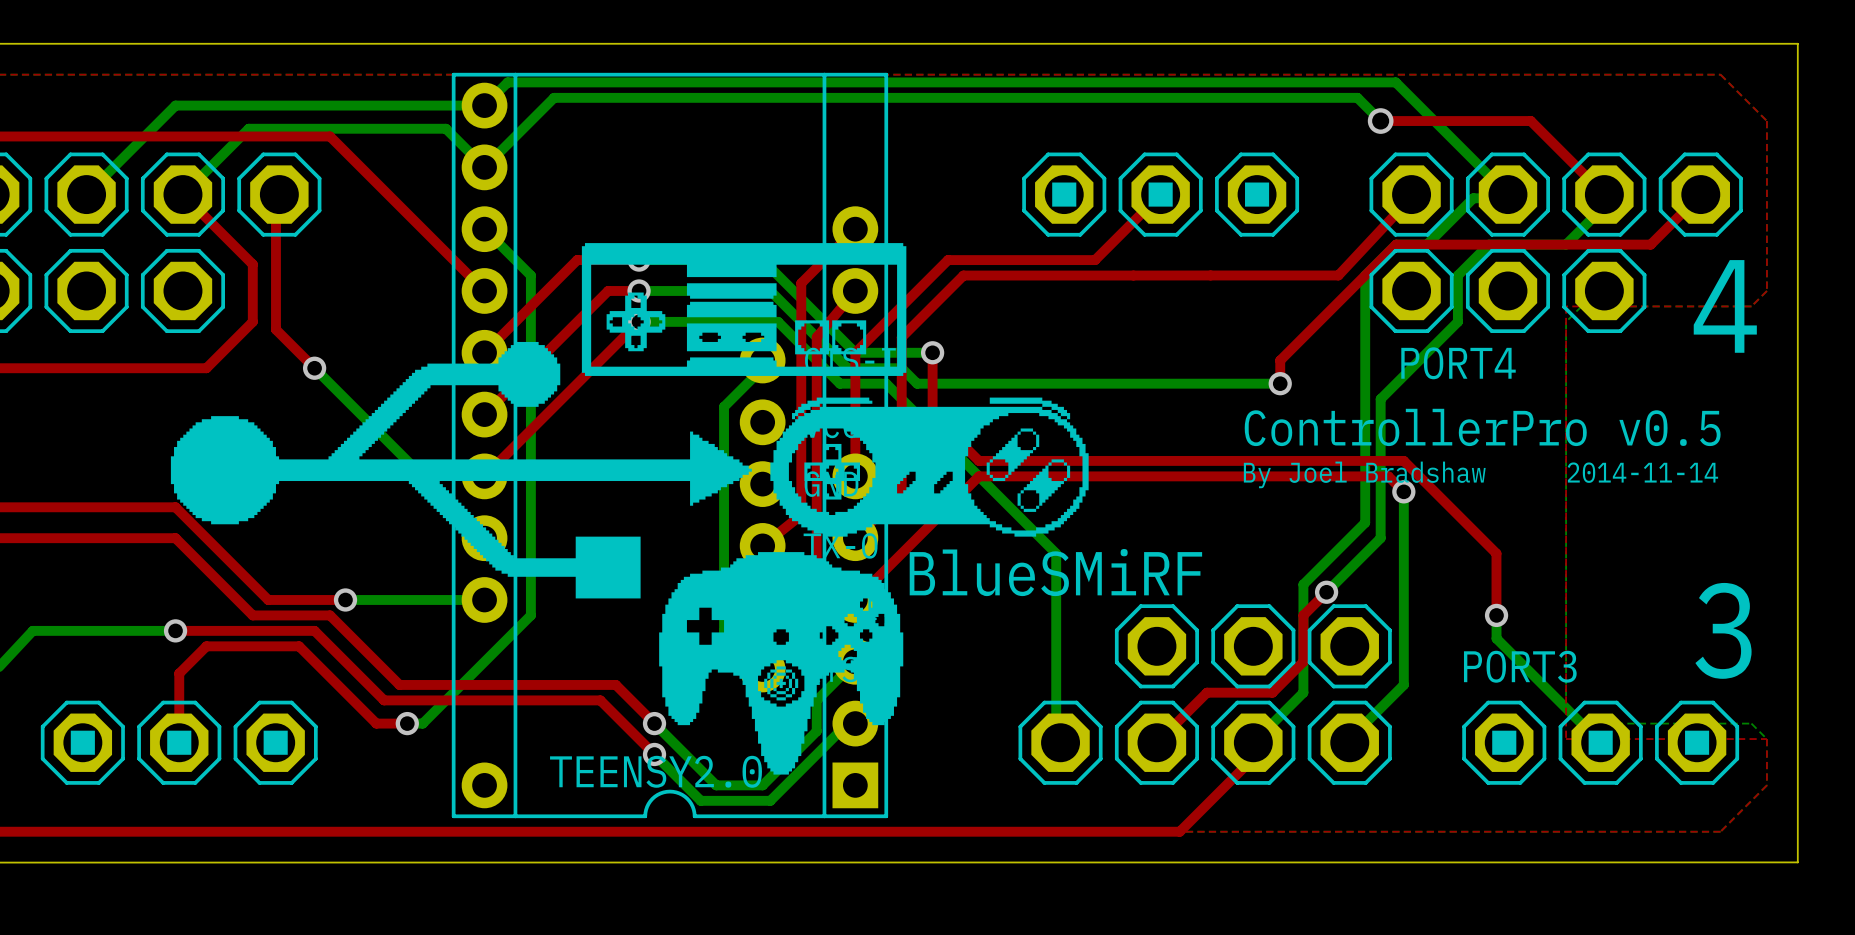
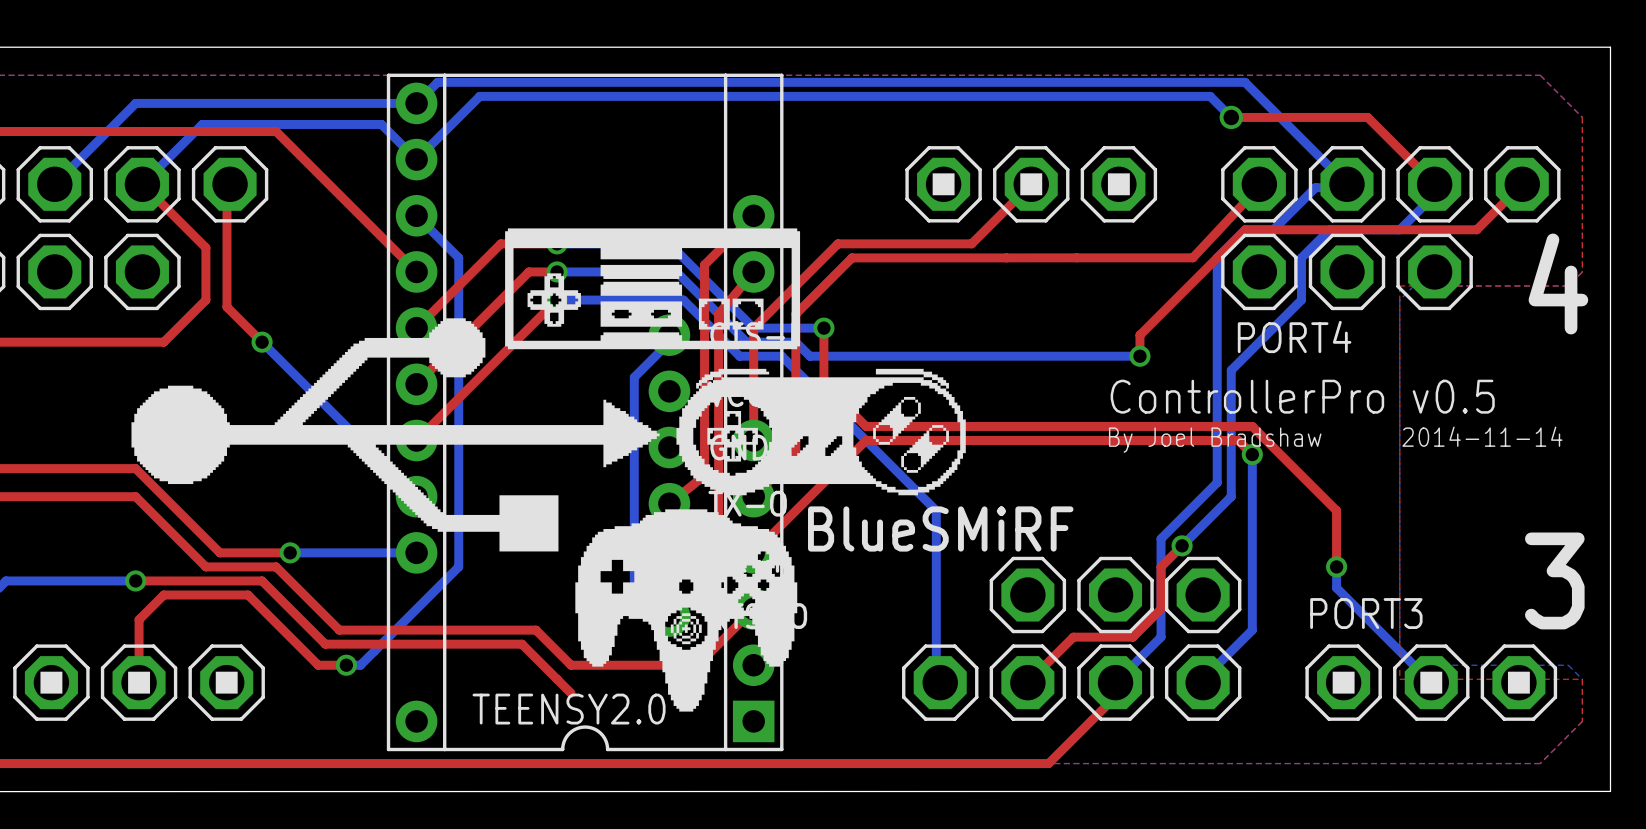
bottom track: (855, 661) (816, 700) (816, 731) (762, 785) (716, 785) (654, 723) -> none
top track: none -> (753, 609) (697, 665) (571, 665)
via: (654, 723) -> none
bottom track: (855, 723) (847, 723) (770, 800) (700, 800) (654, 754) -> none
via: (654, 754) -> none

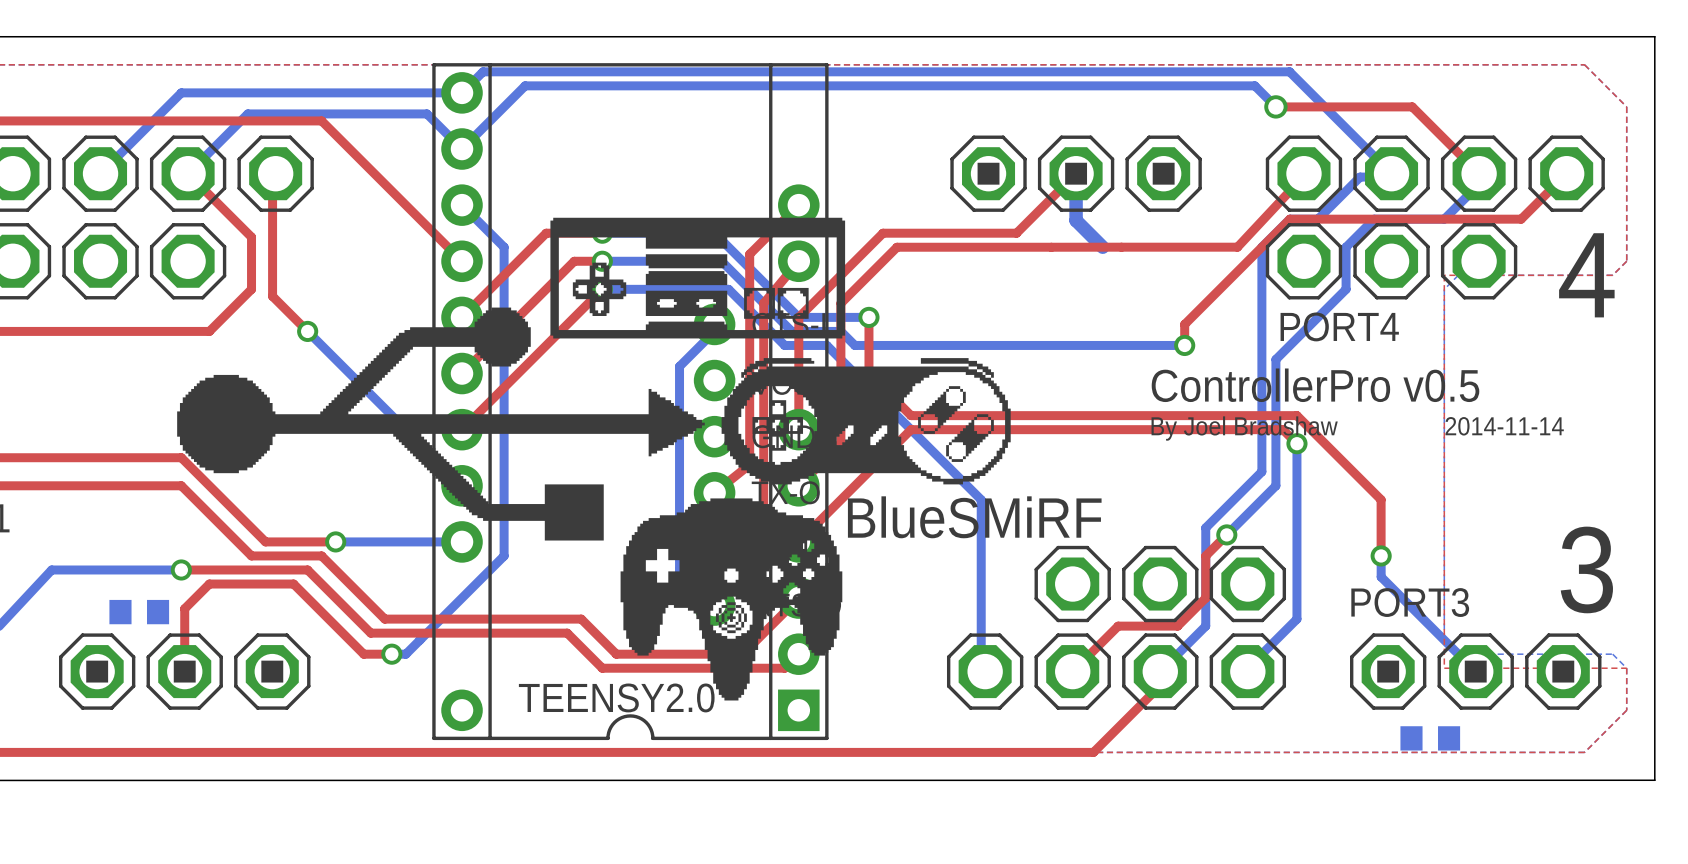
bottom track: none -> (1076, 173) (1076, 220) (1102, 247)
part: none -> (139, 612)
top track: (557, 679) (571, 693) -> (602, 668) (784, 668) (798, 654)
part: none -> (1430, 738)

